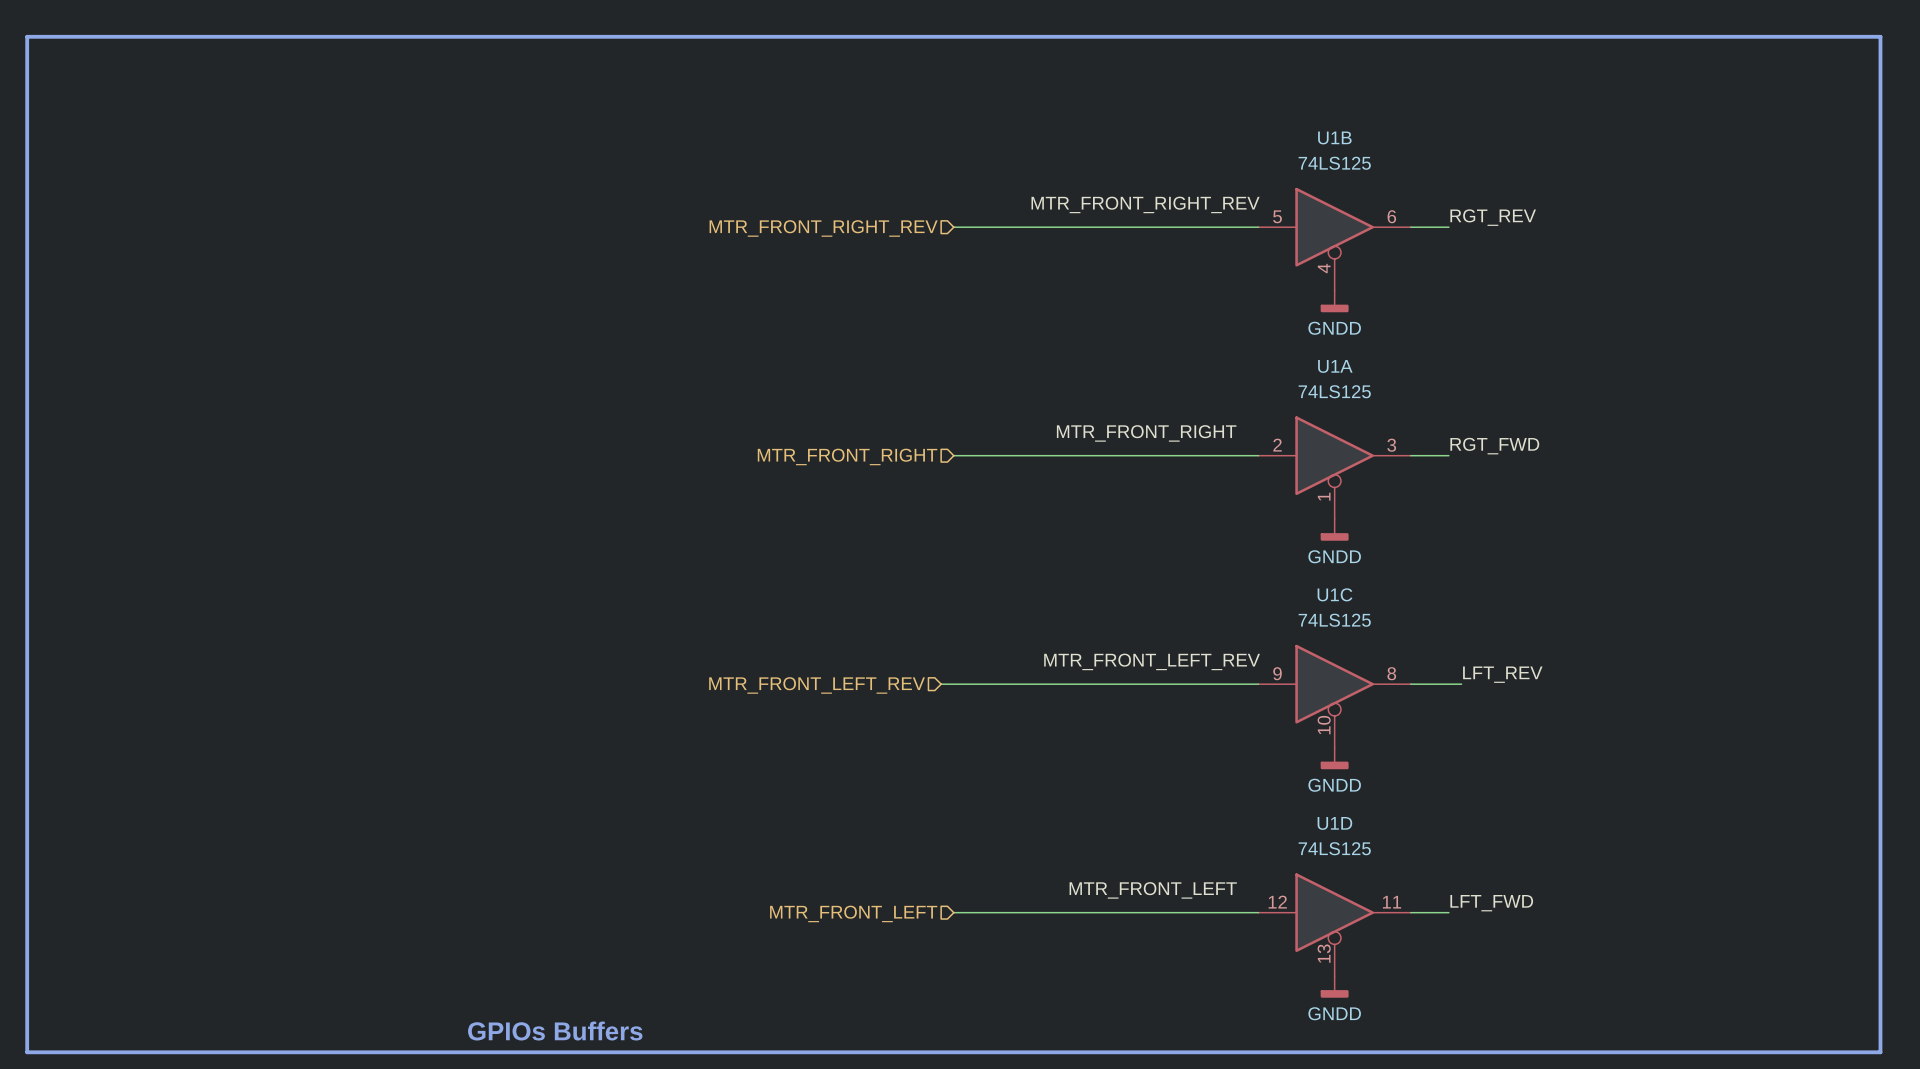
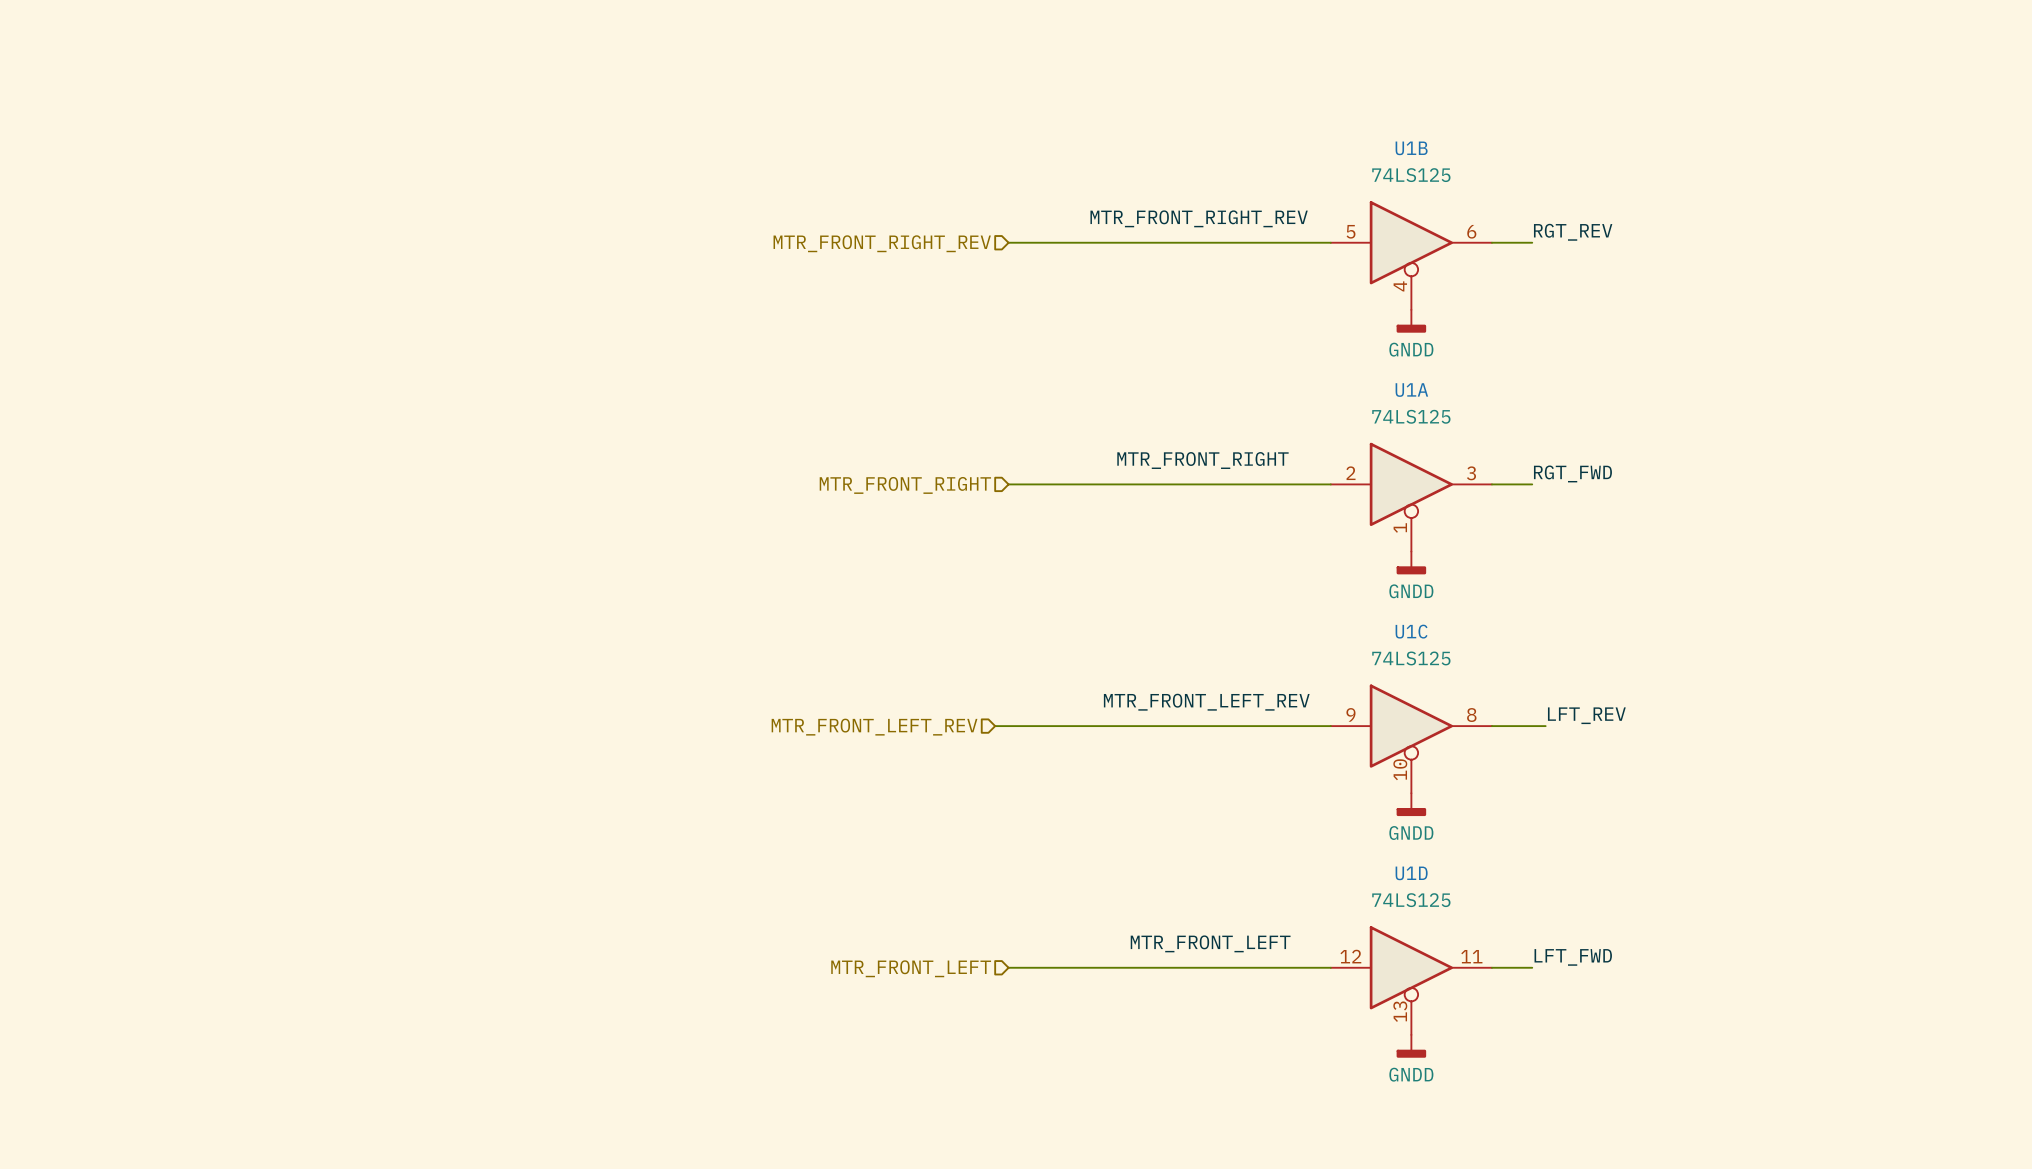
line: (27, 36) (1880, 36) (1880, 1052) (27, 1052) (27, 36) -> none
text: GPIOs Buffers (555, 1031) -> none

